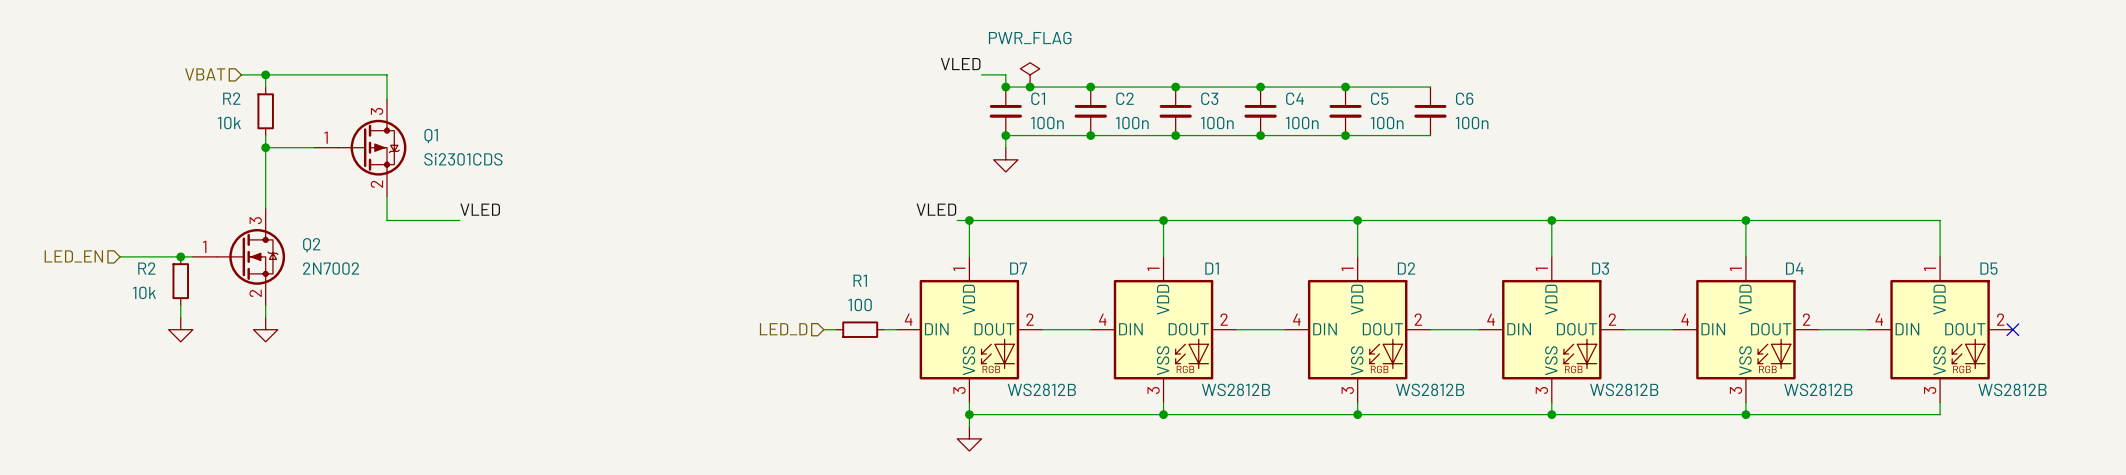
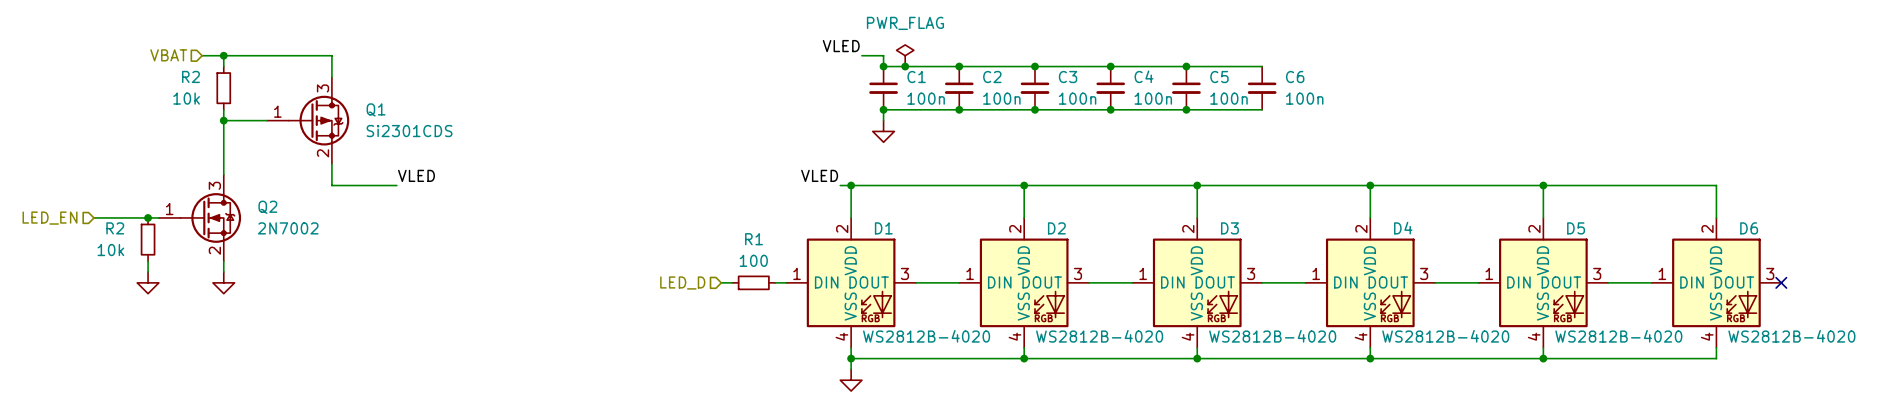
D1 name position: D1 (1212, 268) -> D1 (883, 228)
D2 name position: D2 (1406, 268) -> D2 (1056, 228)
D3 name position: D3 (1600, 268) -> D3 (1229, 228)
D4 name position: D4 (1794, 268) -> D4 (1403, 228)
D5 name position: D5 (1988, 268) -> D5 (1576, 228)
D1 pin number: 1 (1153, 269) -> 2 (842, 229)
D2 pin number: 1 (1347, 269) -> 2 (1015, 229)
D3 pin number: 1 (1541, 269) -> 2 (1188, 229)
D4 pin number: 1 (1735, 269) -> 2 (1361, 229)
D5 pin number: 1 (1930, 269) -> 2 (1534, 229)
D1 pin number: 4 (1102, 319) -> 1 (797, 273)
D1 pin number: 2 (1224, 319) -> 3 (904, 273)
D2 pin number: 4 (1296, 319) -> 1 (970, 273)
D2 pin number: 2 (1418, 319) -> 3 (1078, 273)
D3 pin number: 4 (1491, 319) -> 1 (1143, 273)
D3 pin number: 2 (1612, 319) -> 3 (1251, 273)
D4 pin number: 4 (1685, 319) -> 1 (1316, 273)
D4 pin number: 2 (1806, 319) -> 3 (1424, 273)
D5 pin number: 4 (1879, 319) -> 1 (1489, 273)
D5 pin number: 2 (2000, 319) -> 3 (1597, 273)
D7: WS2812B (969, 329) -> none
D1 position: (1163, 329) -> (851, 282)
D2 position: (1357, 329) -> (1024, 282)
D3 position: (1551, 329) -> (1197, 282)
D4 position: (1745, 329) -> (1370, 282)
D5 position: (1940, 329) -> (1543, 282)
D6: none -> WS2812B-4020 (1716, 282)
D1 value: WS2812B (1235, 389) -> WS2812B-4020 (926, 336)
D2 value: WS2812B (1430, 389) -> WS2812B-4020 (1099, 336)
D3 value: WS2812B (1624, 389) -> WS2812B-4020 (1272, 336)
D4 value: WS2812B (1818, 389) -> WS2812B-4020 (1445, 336)
D5 value: WS2812B (2012, 389) -> WS2812B-4020 (1618, 336)
D1 pin number: 3 (1153, 390) -> 4 (841, 336)
D2 pin number: 3 (1347, 390) -> 4 (1015, 336)
D3 pin number: 3 (1541, 390) -> 4 (1188, 336)
D4 pin number: 3 (1735, 390) -> 4 (1361, 336)
D5 pin number: 3 (1930, 390) -> 4 (1534, 336)

